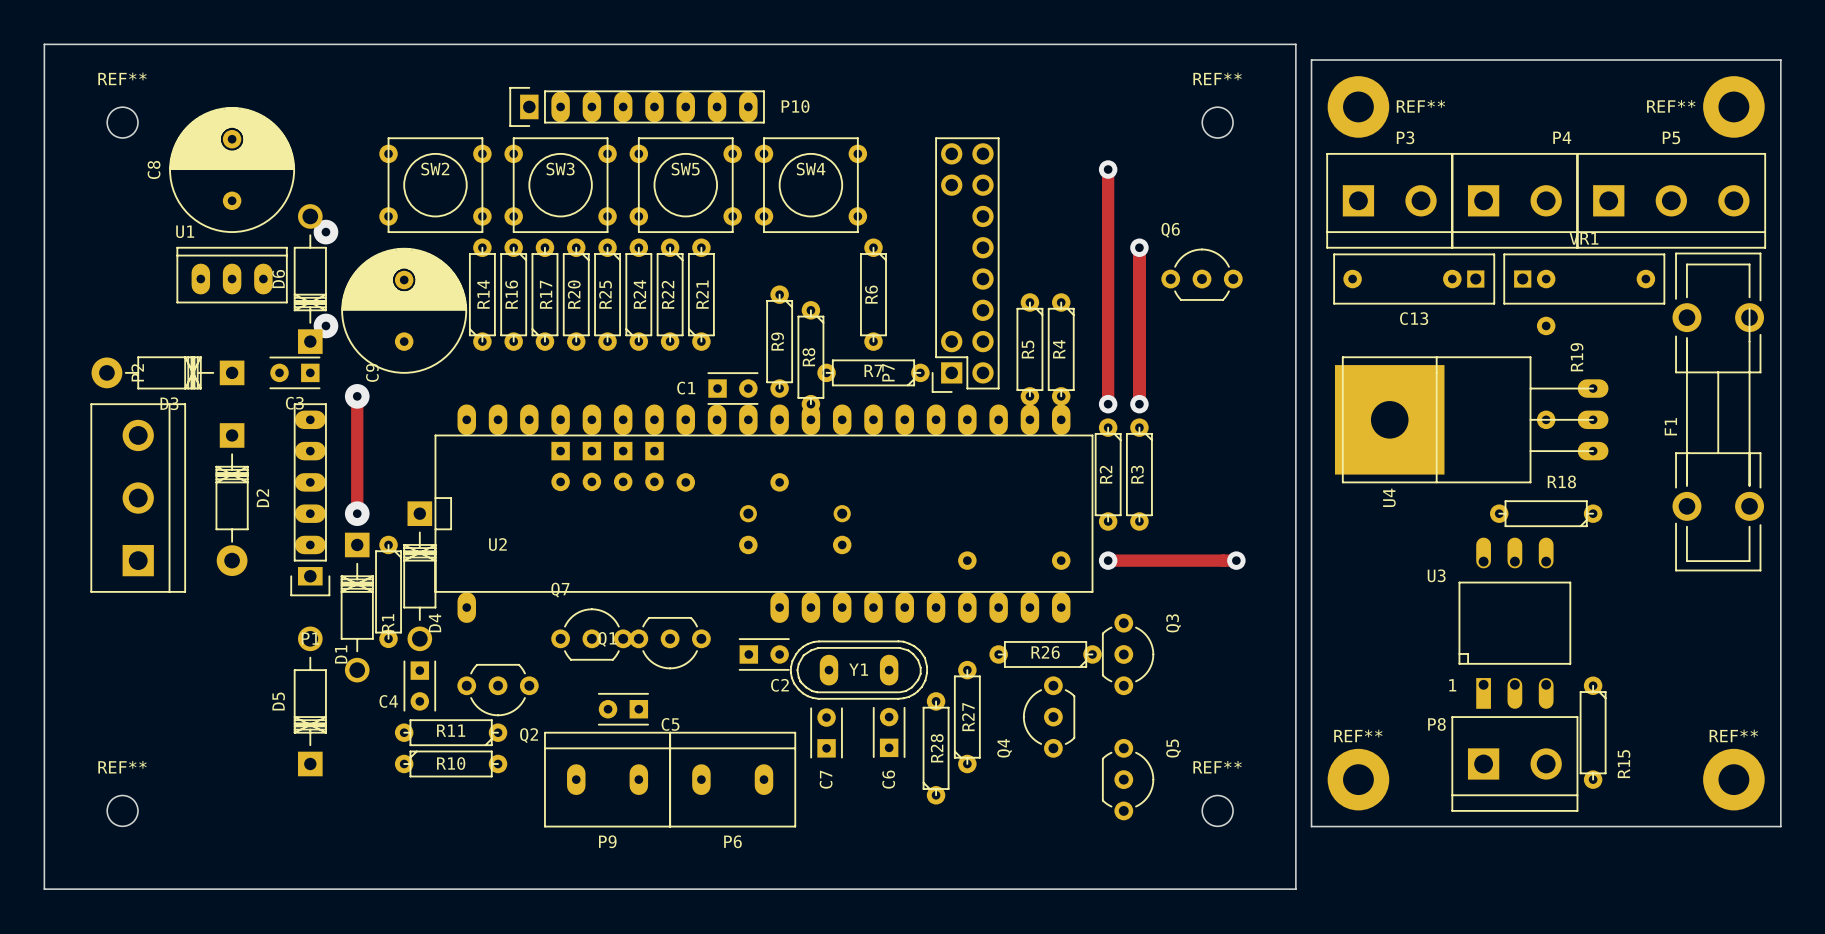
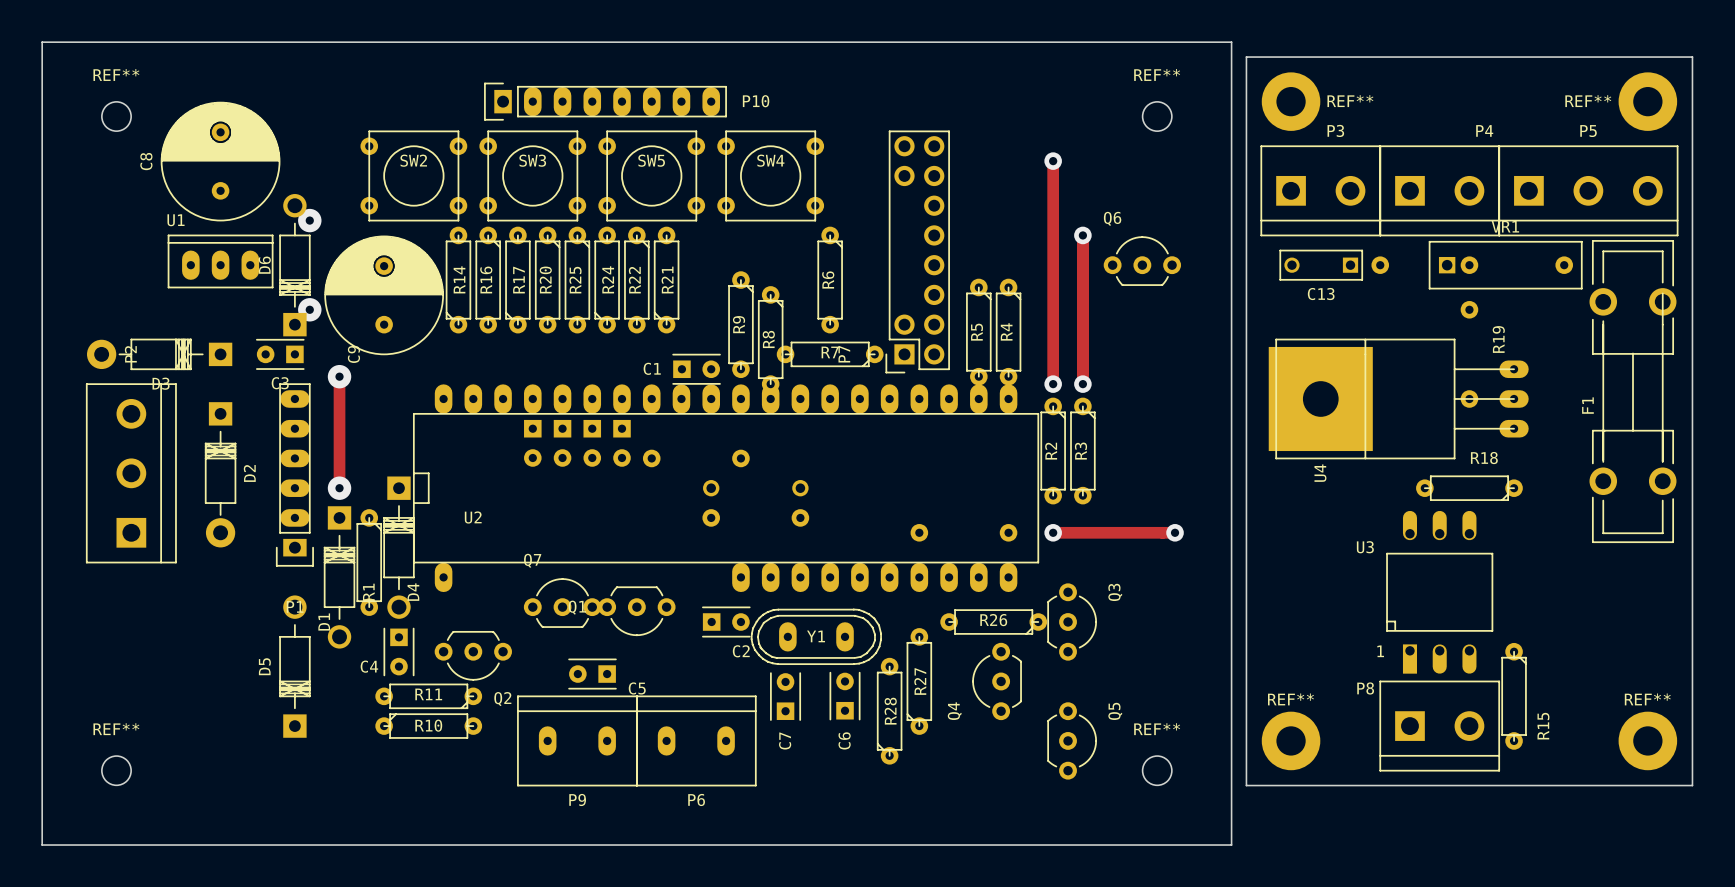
C13 footprint: [1333, 253, 1496, 305] -> [1279, 249, 1364, 281]

